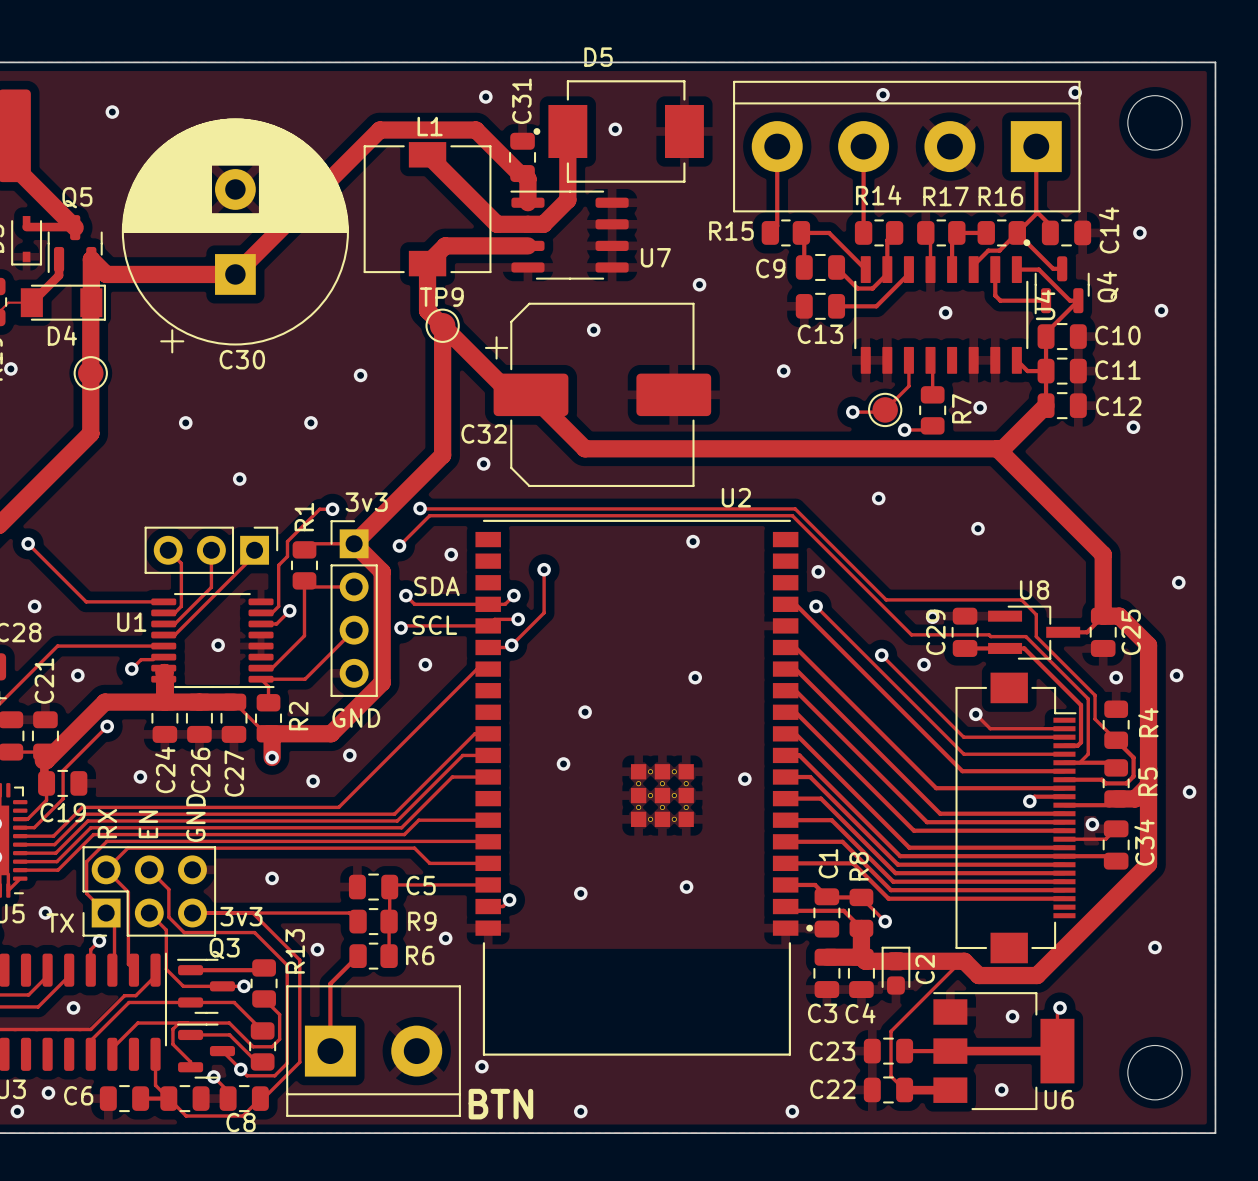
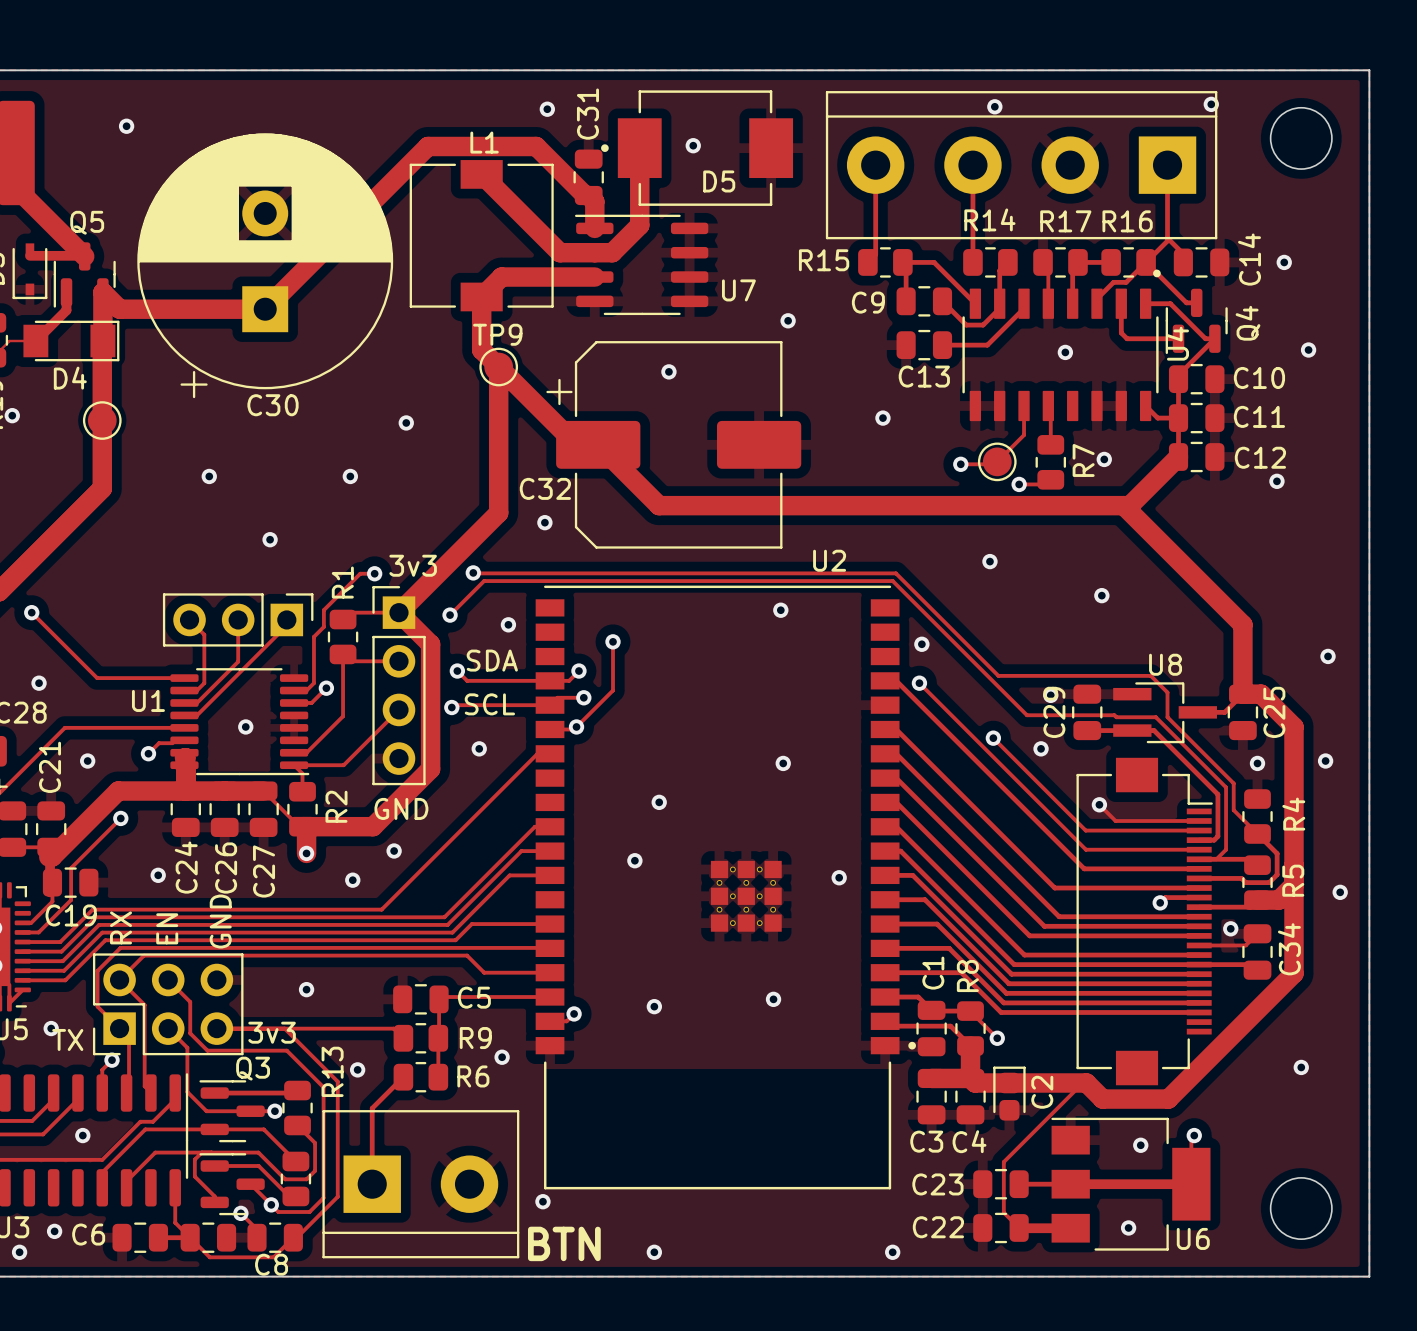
D5 name position: D5 (598, 57) -> D5 (719, 181)

